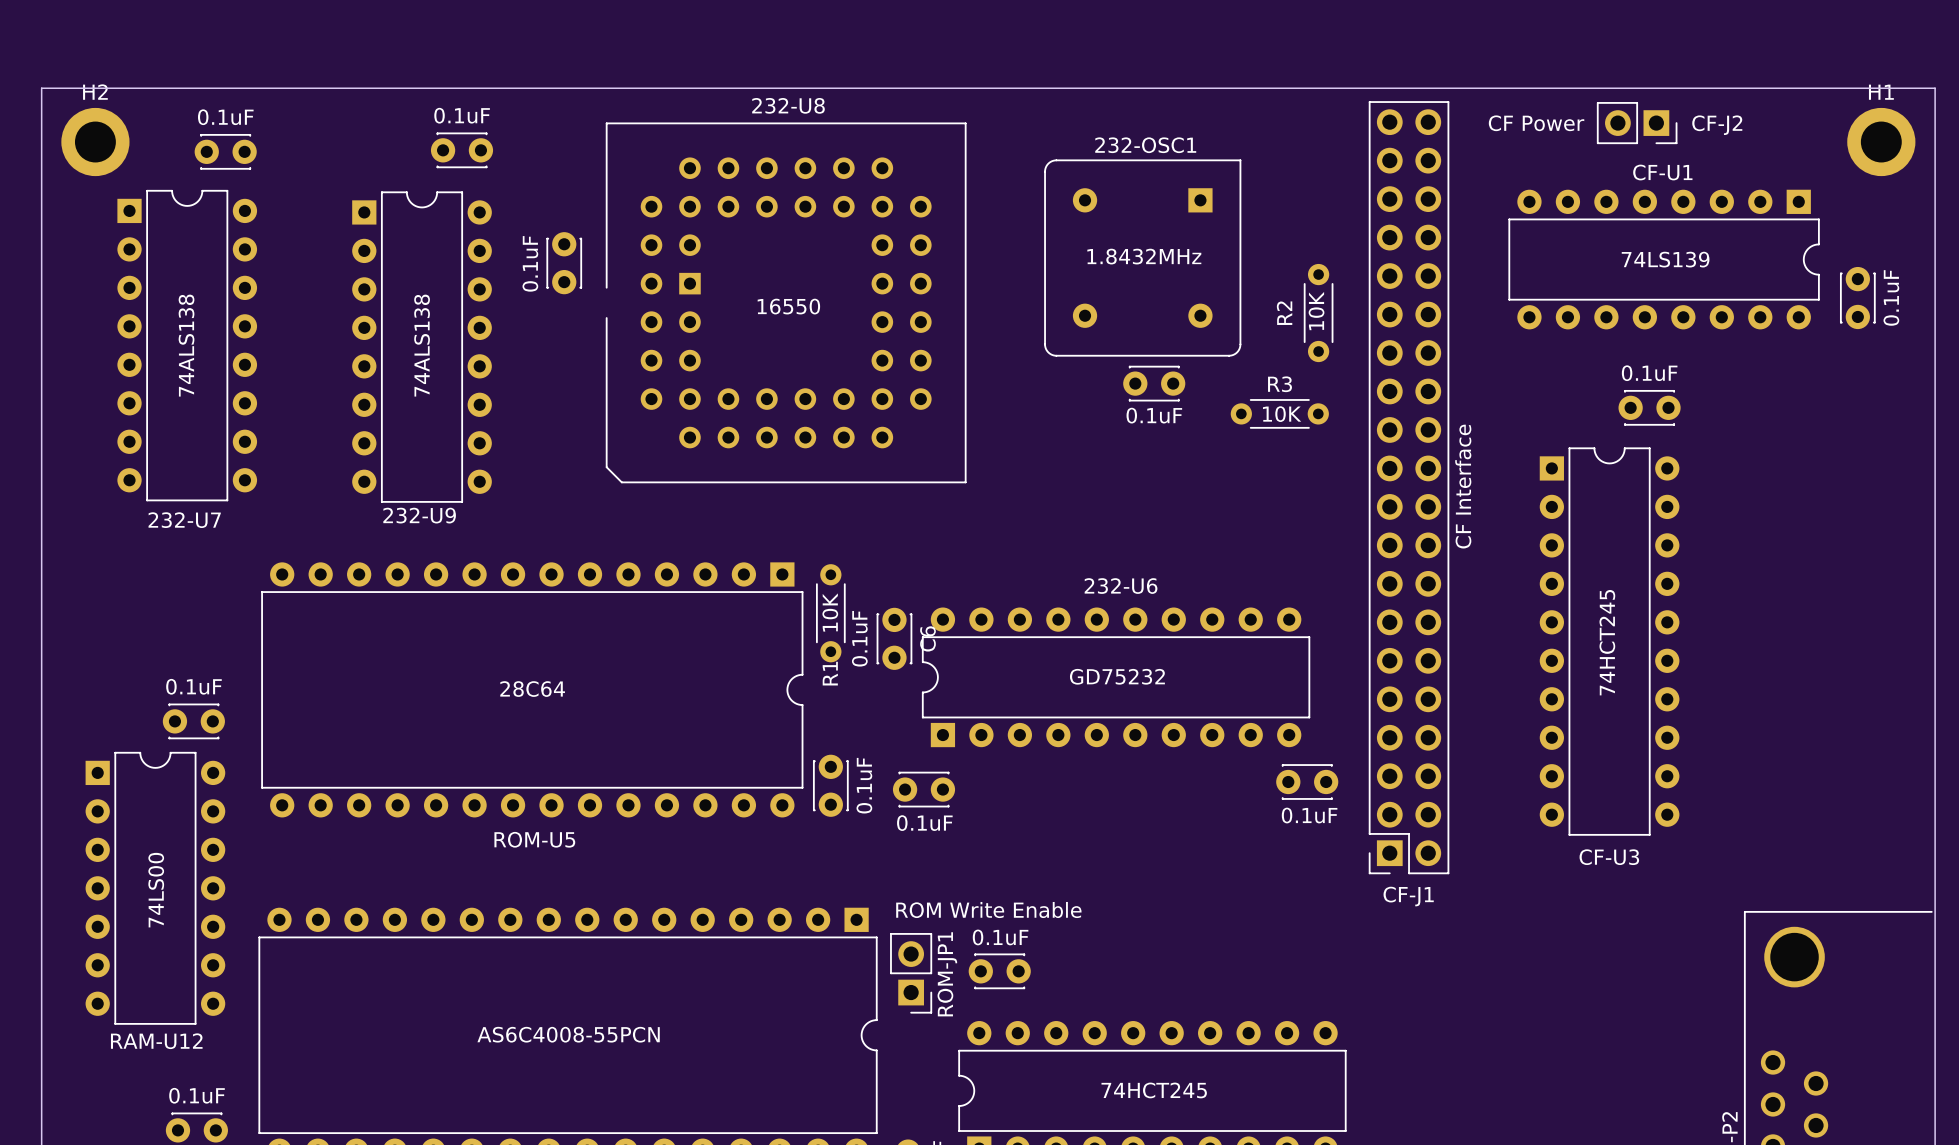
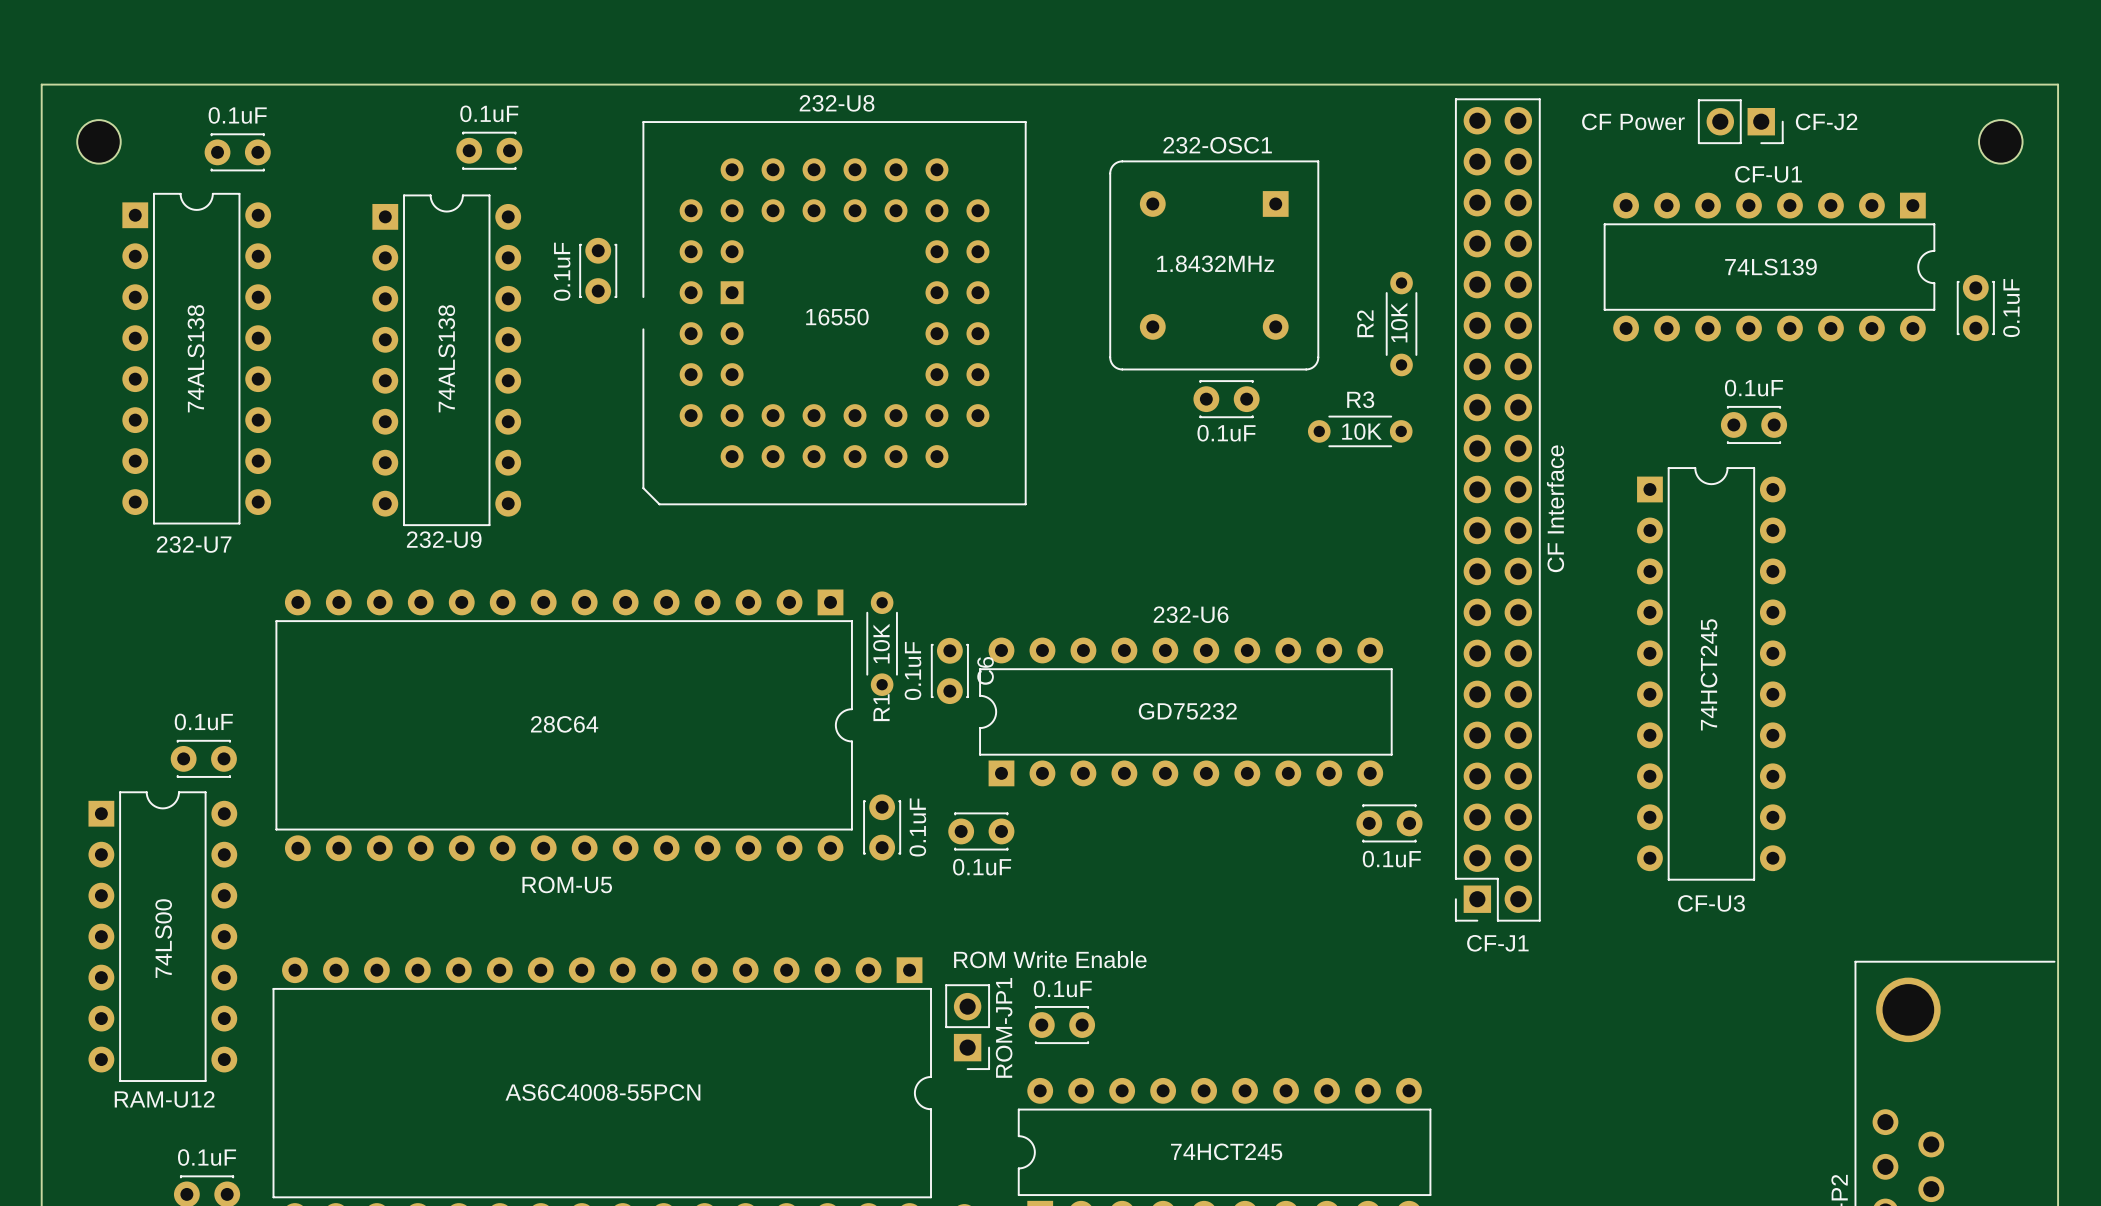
H2: (95, 142) -> none
part: none -> (98, 141)
H1: (1881, 142) -> none
part: none -> (2000, 141)

